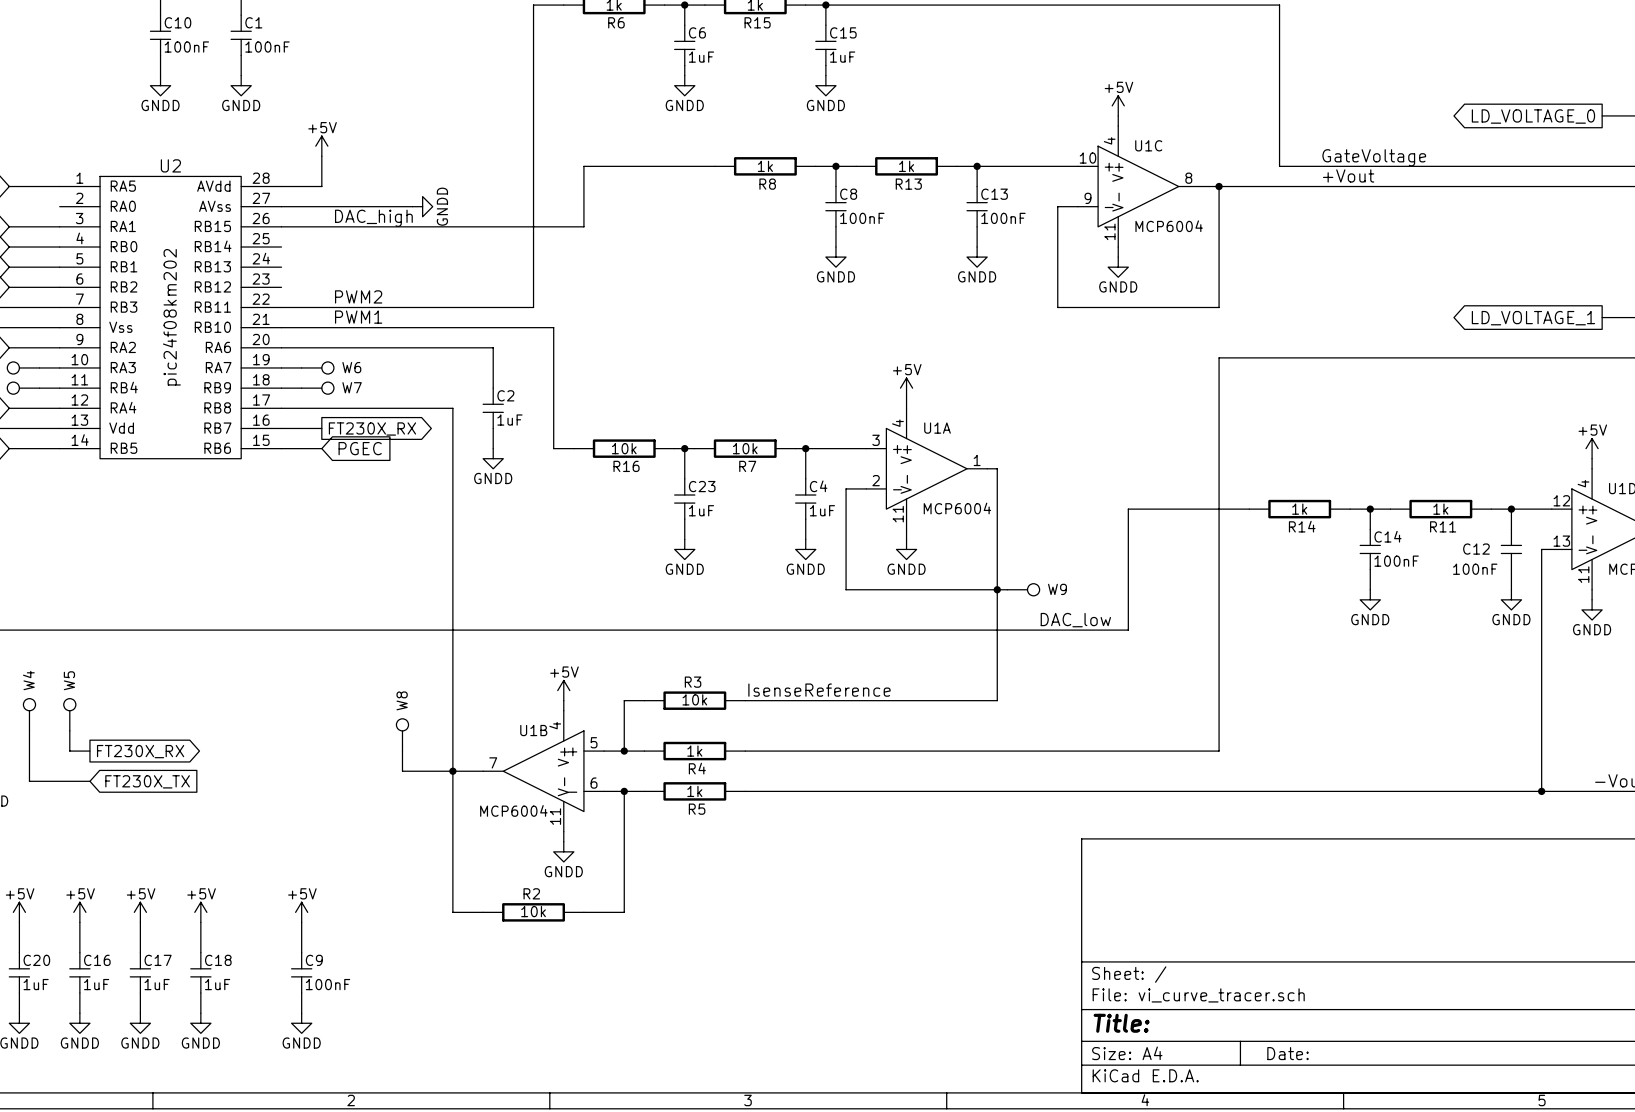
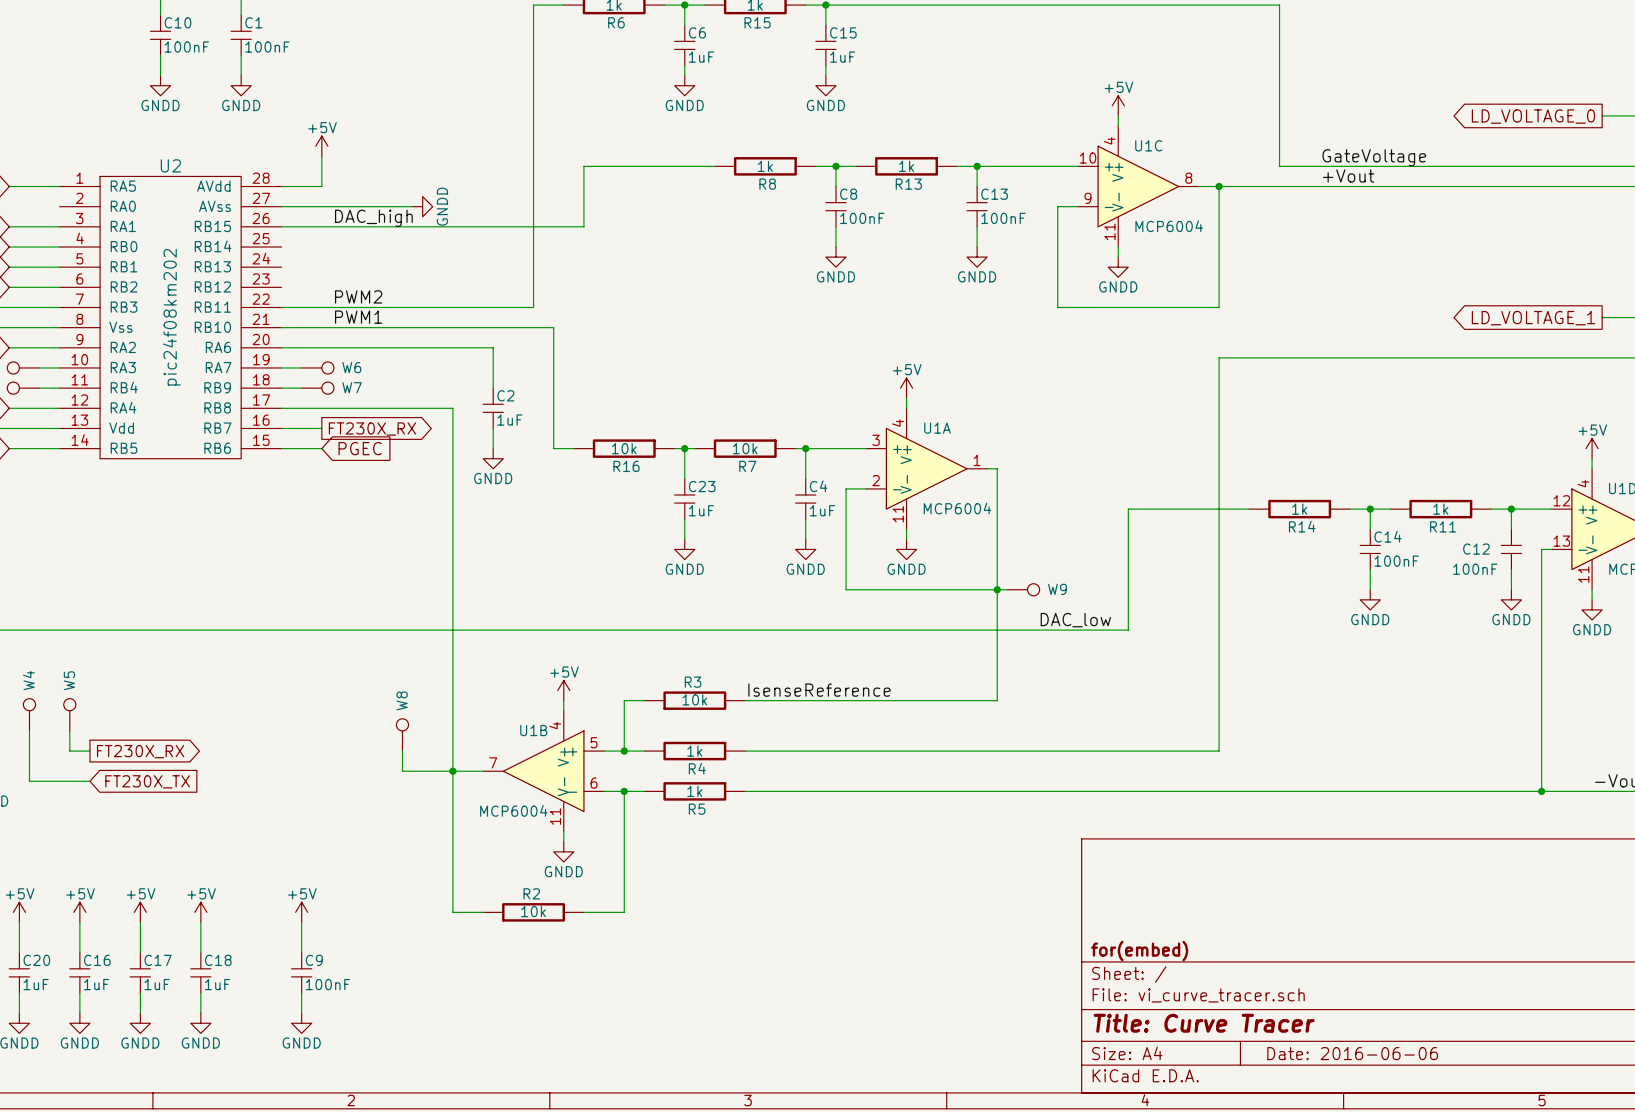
title block: none -> for(embed) (1139, 951)
title block: Title: (1121, 1023) -> Title: Curve Tracer (1204, 1023)
title block: Date: (1288, 1053) -> Date: 2016-06-06 (1352, 1053)

